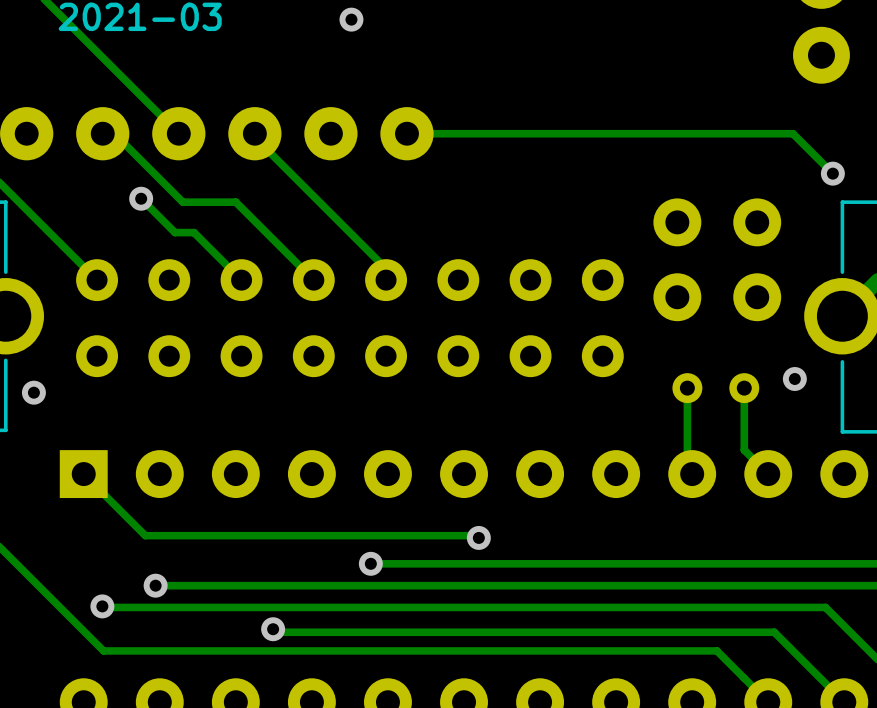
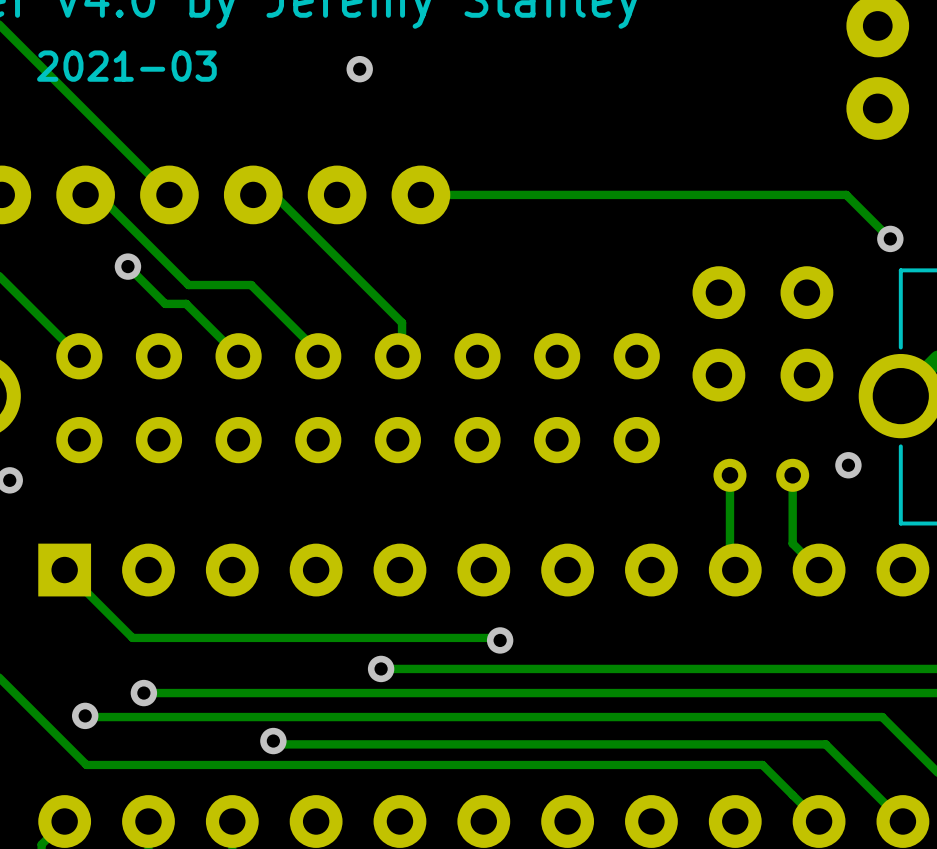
track: (254, 133) (254, 137) (386, 268) (386, 280) -> (253, 194) (274, 194) (402, 322) (402, 356)
track: (182, 202) (235, 202) (313, 280) -> (173, 270) (188, 285) (251, 285) (322, 356)

